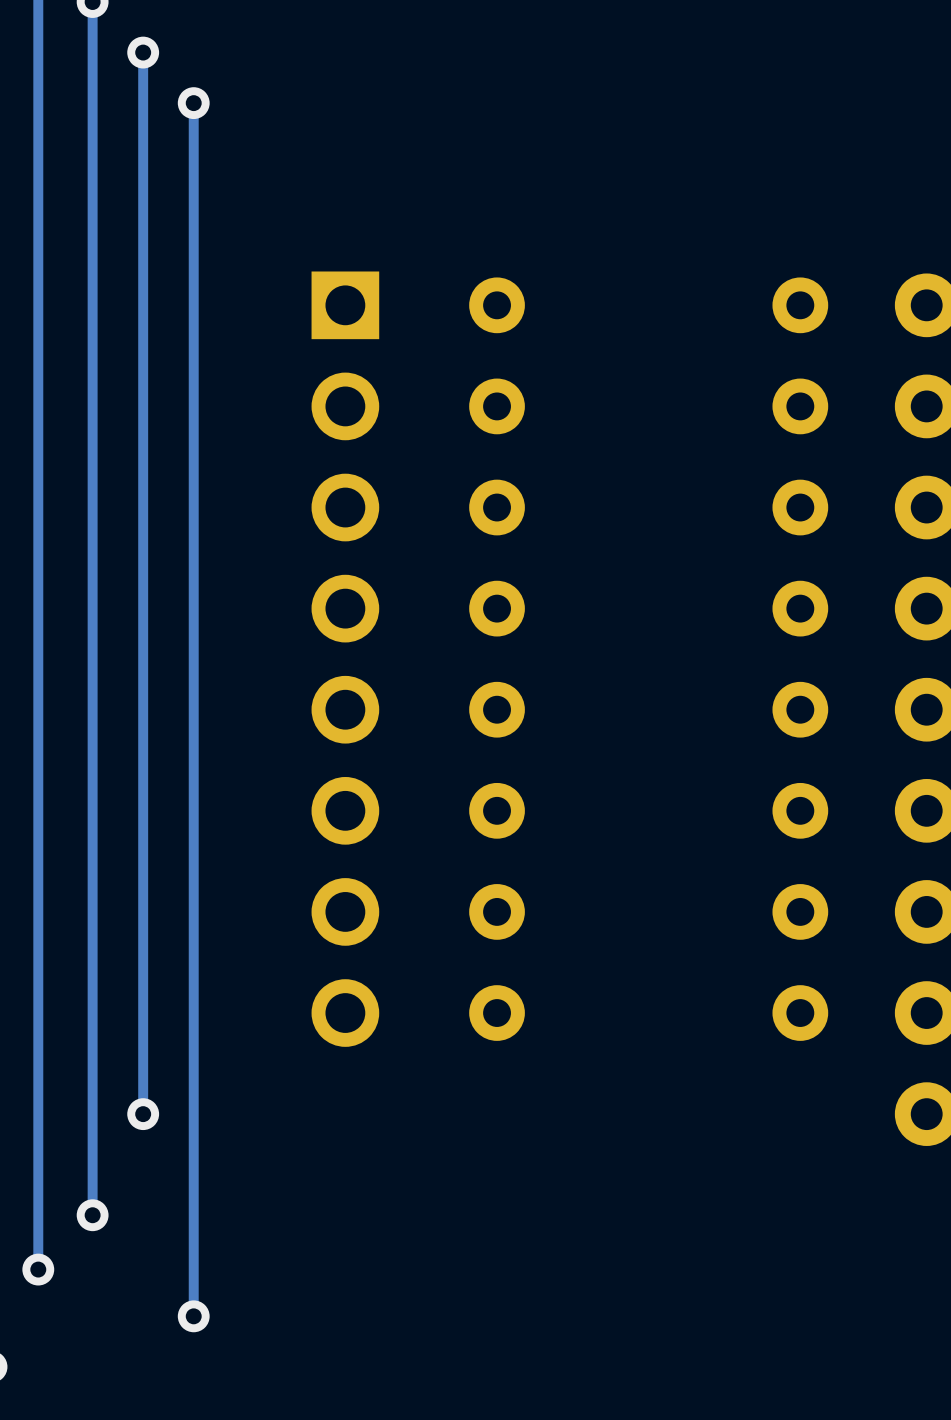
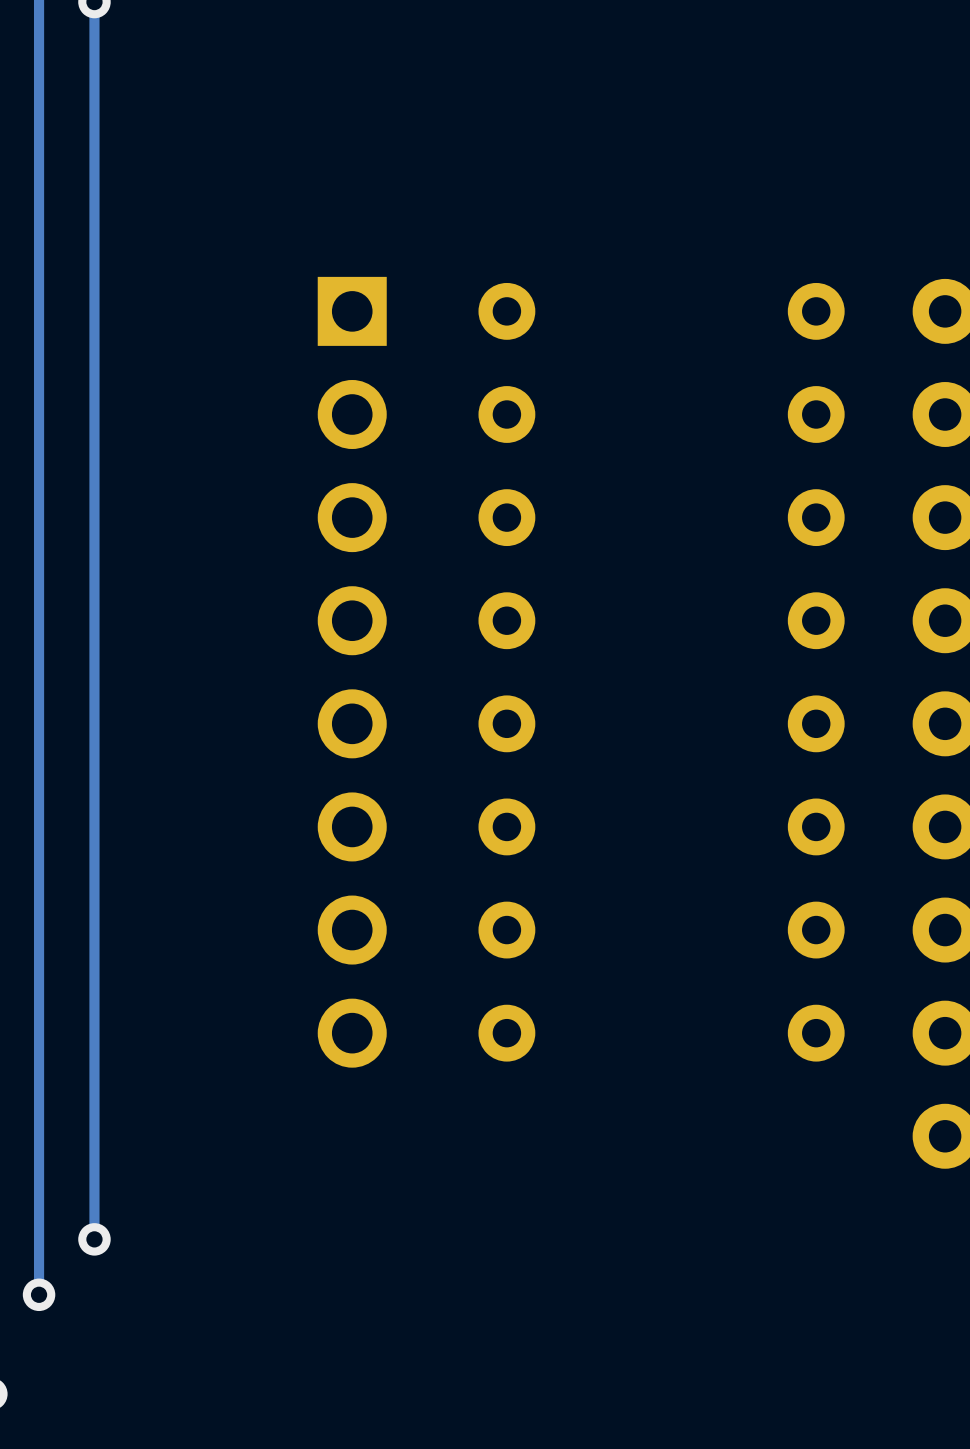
track: (143, 52) (143, 1114) -> none
via: (143, 52) -> none
track: (193, 103) (193, 1316) -> none
via: (193, 103) -> none
via: (143, 1114) -> none
via: (193, 1316) -> none

